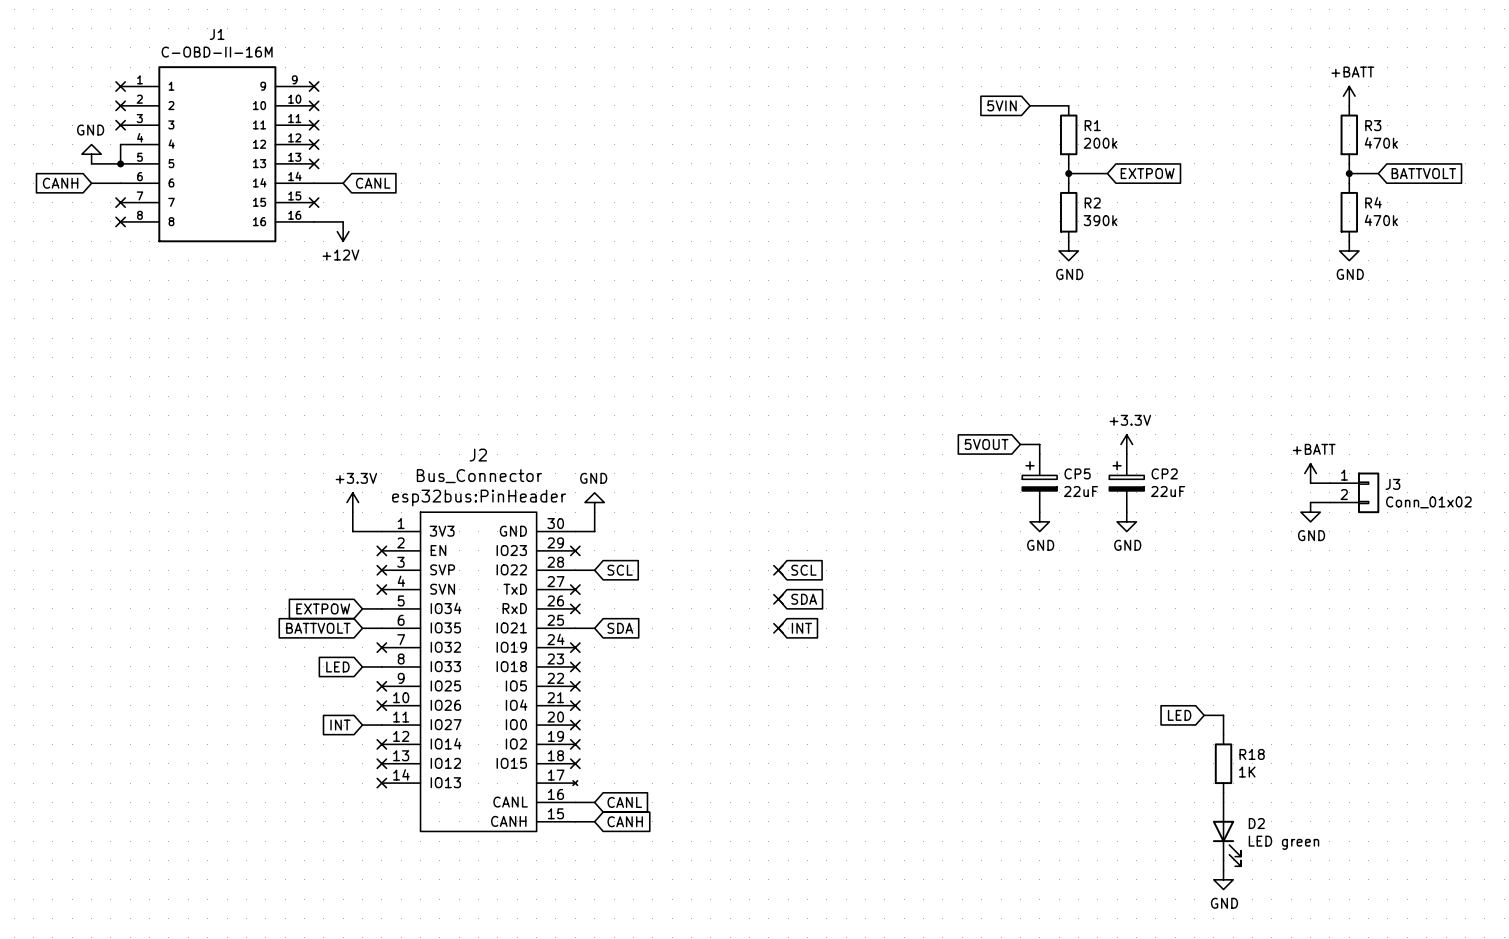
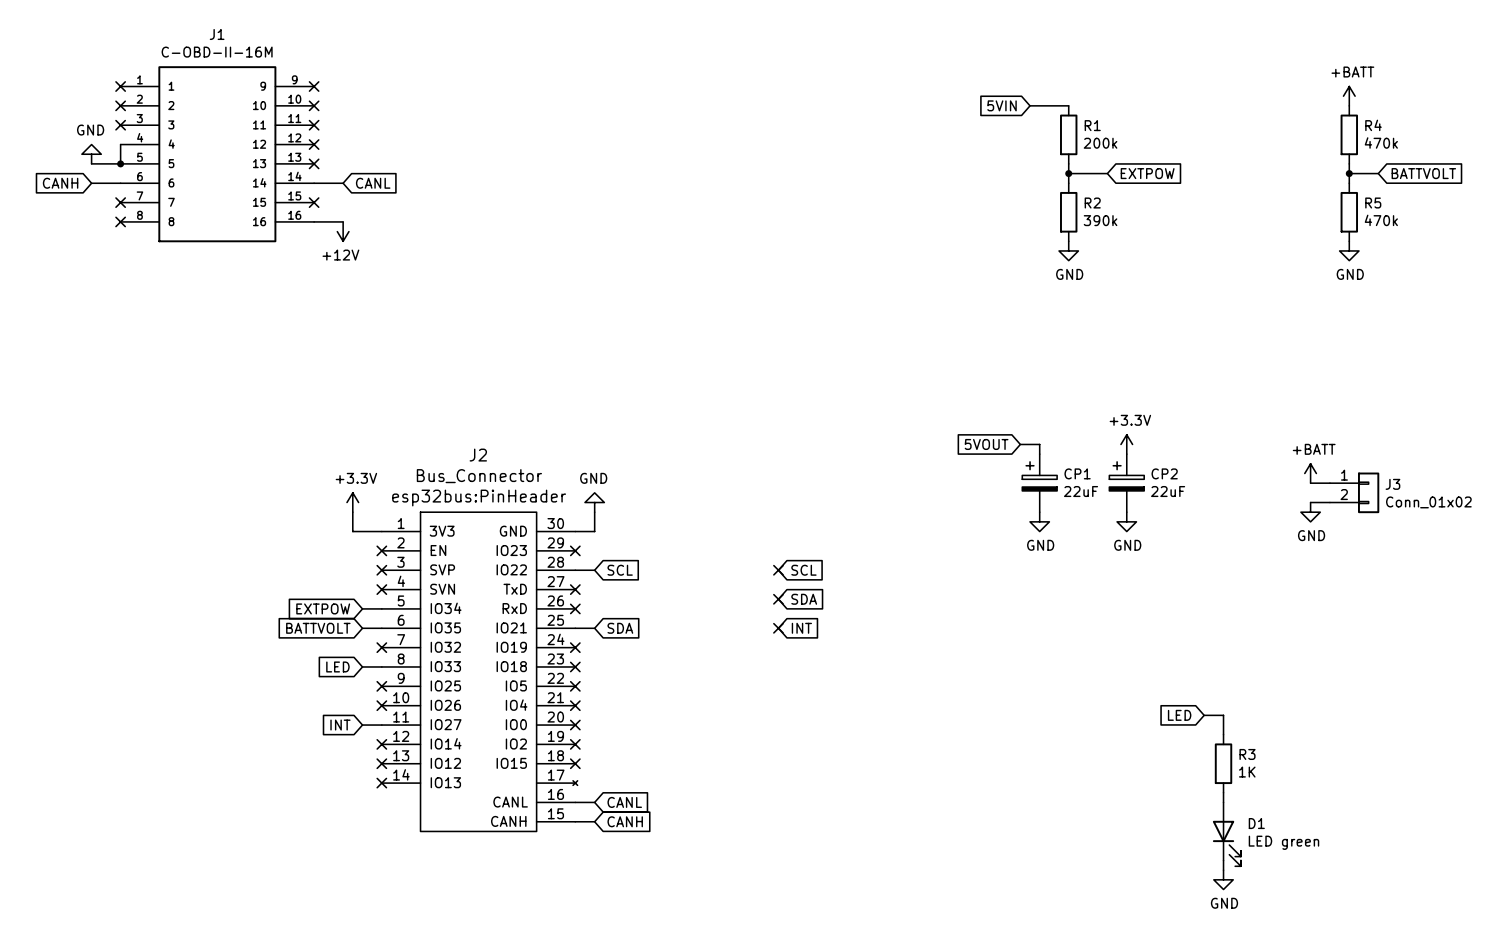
R3 name: R3 (1373, 125) -> R4 (1373, 125)
R4 name: R4 (1373, 202) -> R5 (1373, 203)
CP5 name: CP5 (1077, 473) -> CP1 (1077, 473)
R18 name: R18 (1252, 754) -> R3 (1247, 754)
D2 name: D2 (1256, 823) -> D1 (1256, 823)

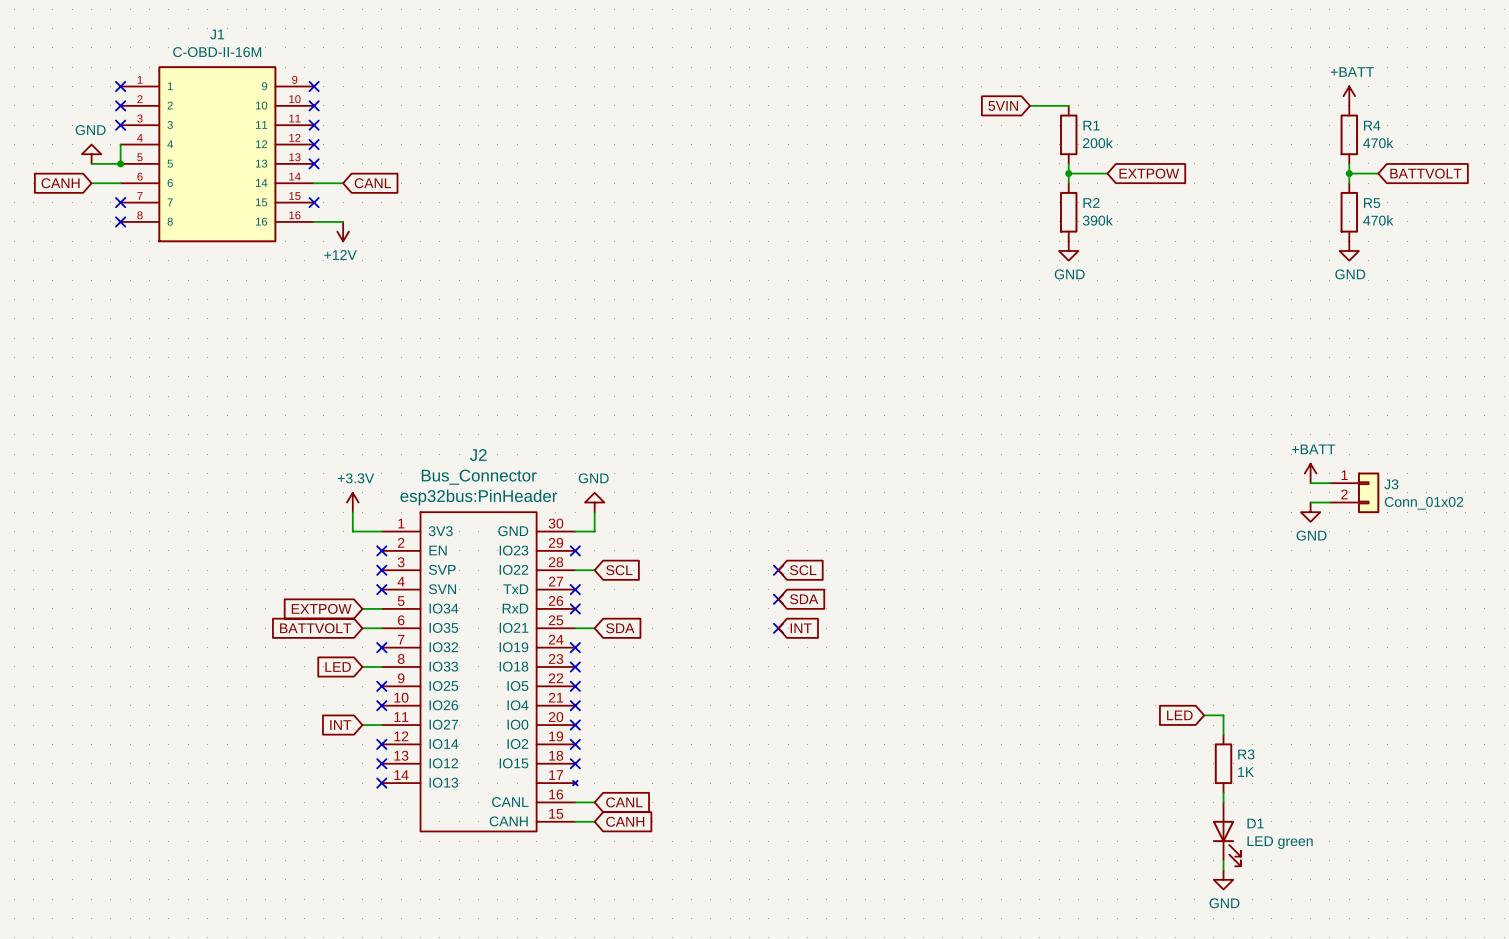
global label: 5VOUT (986, 444) -> none
wire: (1020, 444) (1039, 444) (1039, 454) -> none
power symbol: +3.3V (1126, 444) -> none
CP1: 22uF (1039, 483) -> none
CP2: 22uF (1126, 483) -> none
power symbol: GND (1039, 521) -> none
power symbol: GND (1126, 521) -> none

